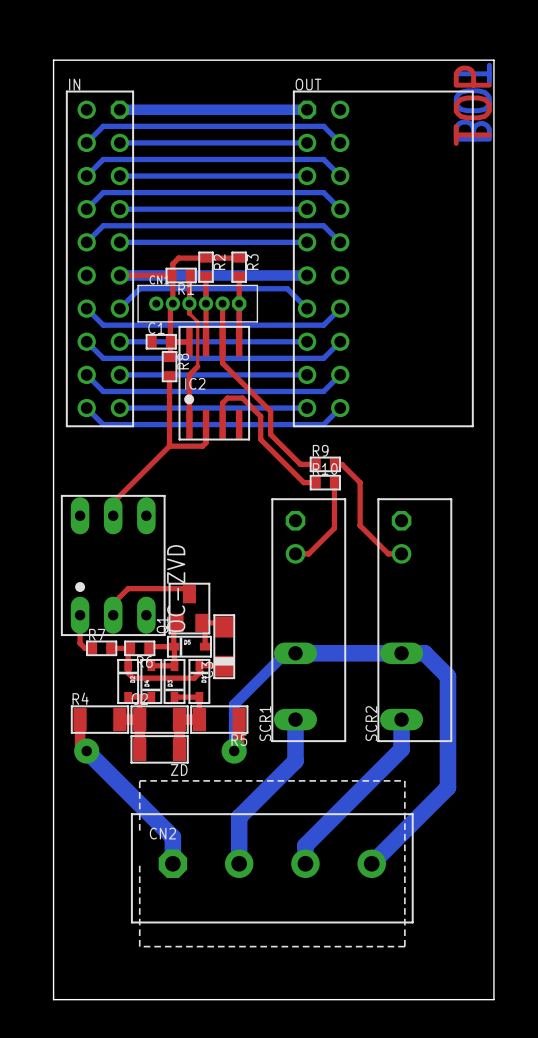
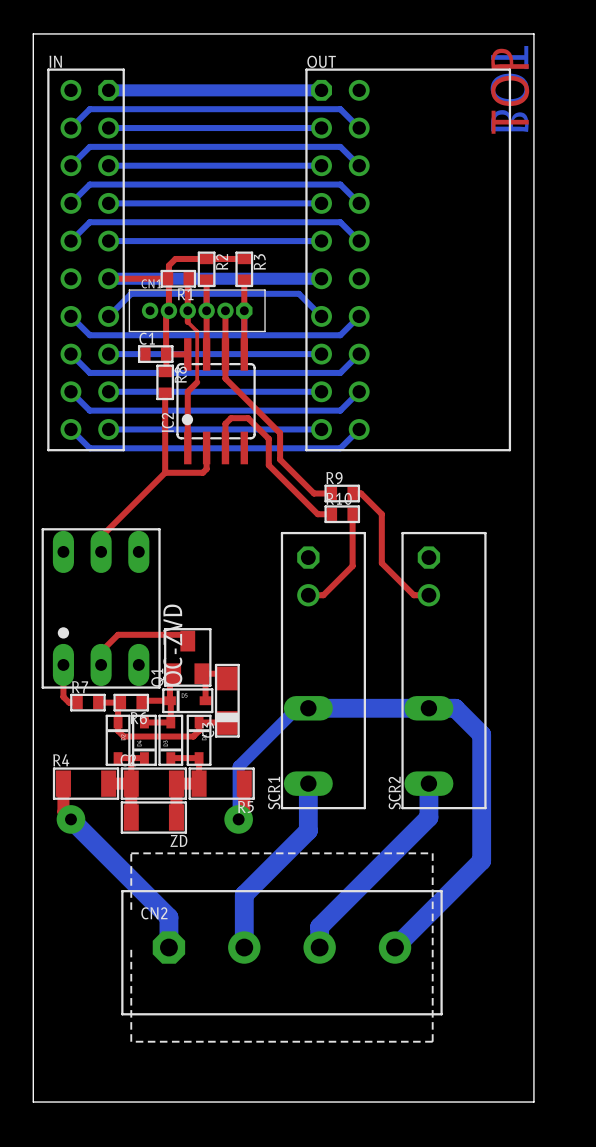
IC2 footprint: [178, 325, 251, 441] -> [176, 338, 256, 465]
IC2 name position: IC2 (195, 383) -> IC2 (167, 422)

